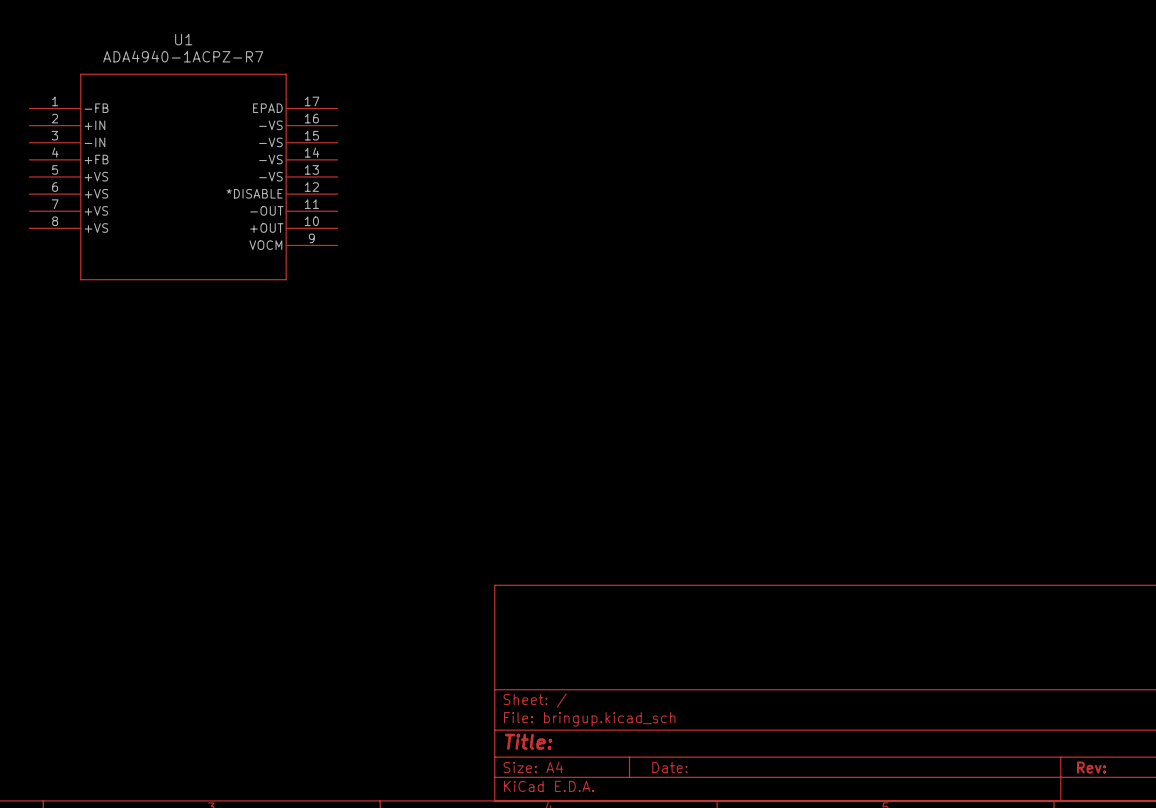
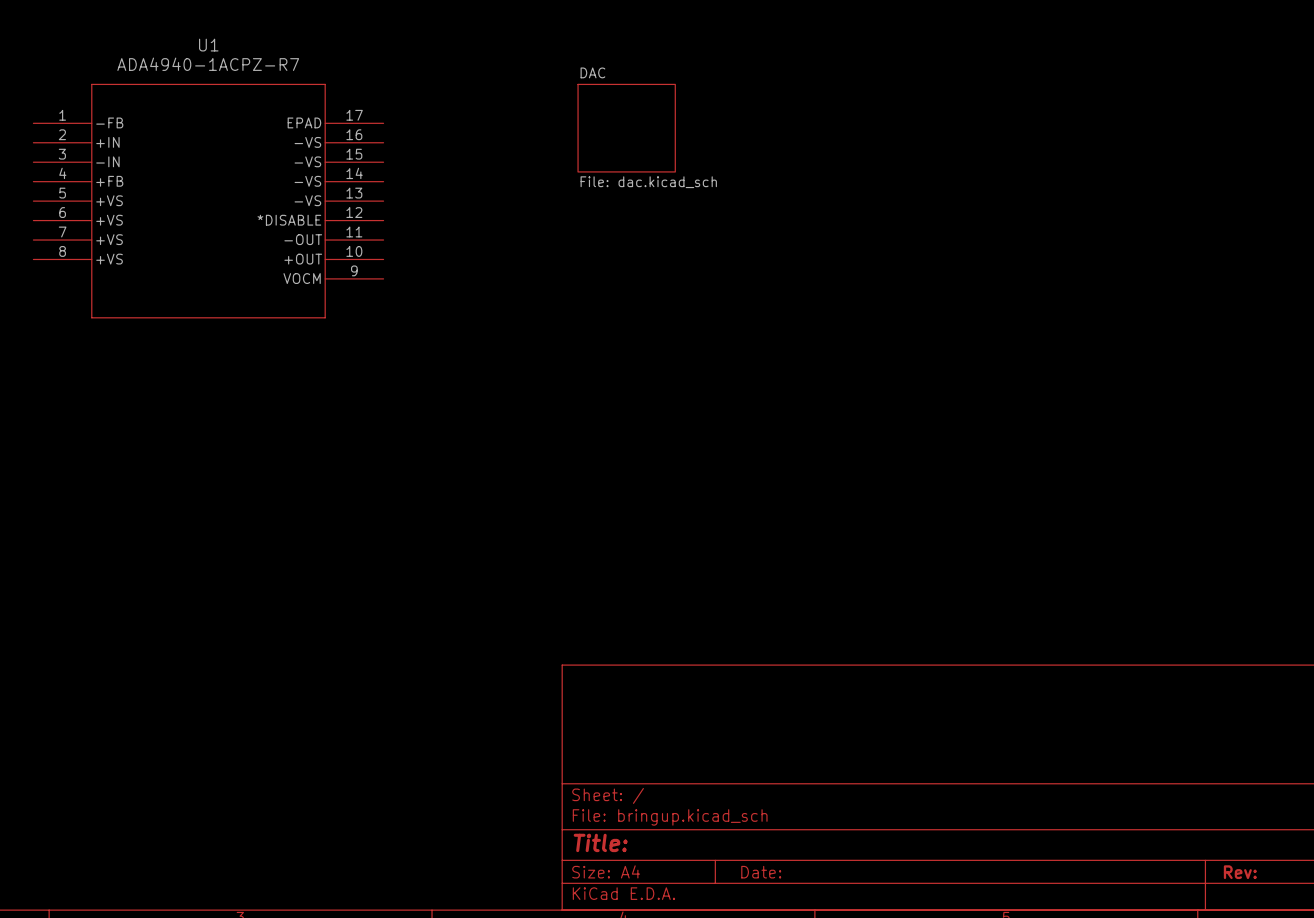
sheet DAC: none -> File: dac.kicad_sch (626, 128)

